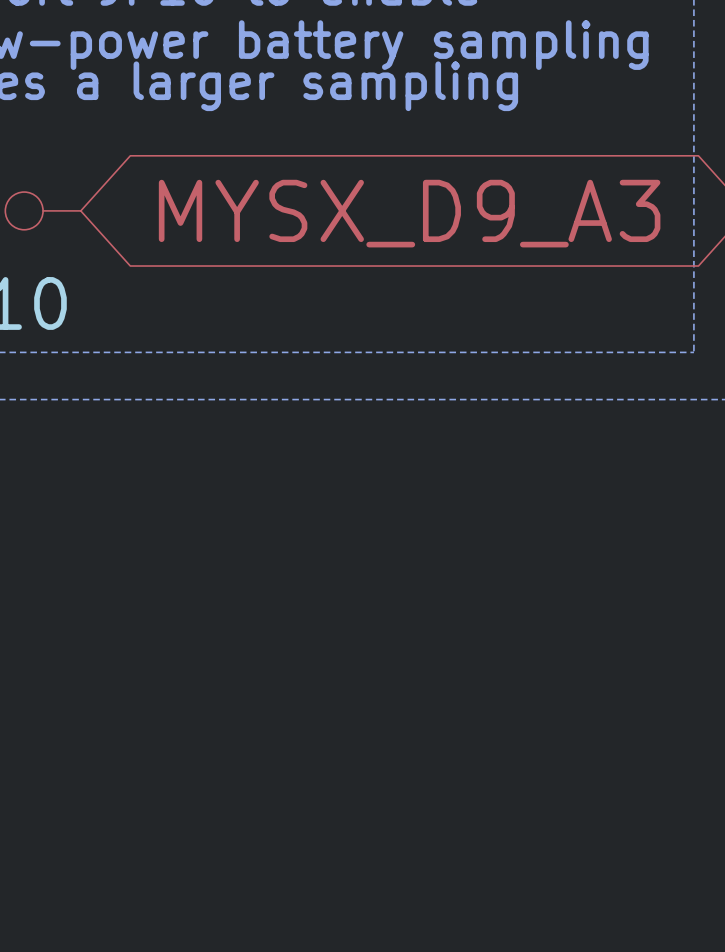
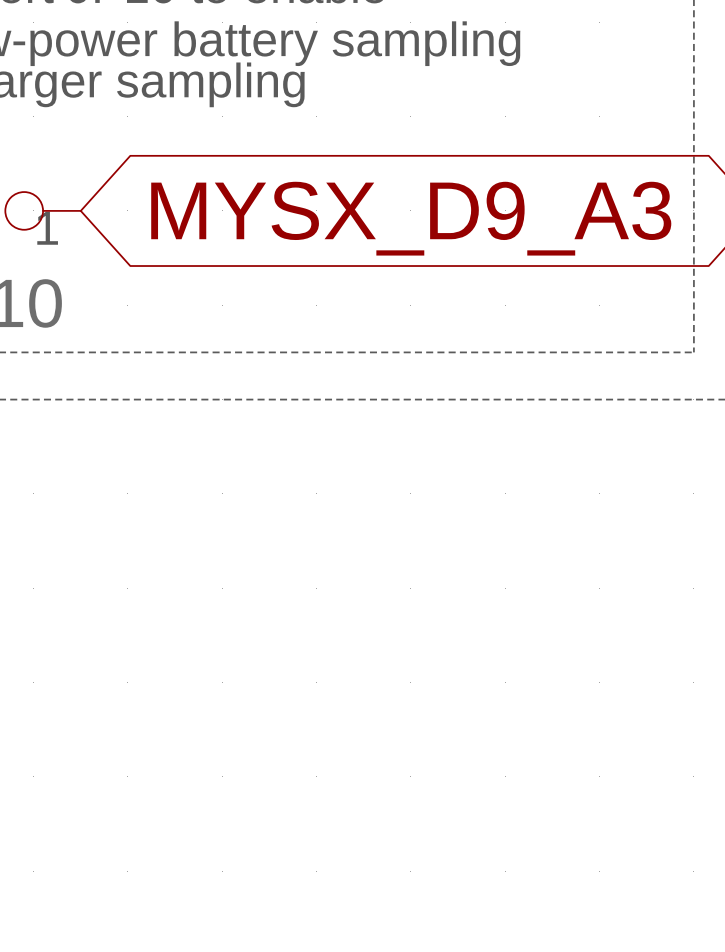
text: none -> 1 (47, 228)

